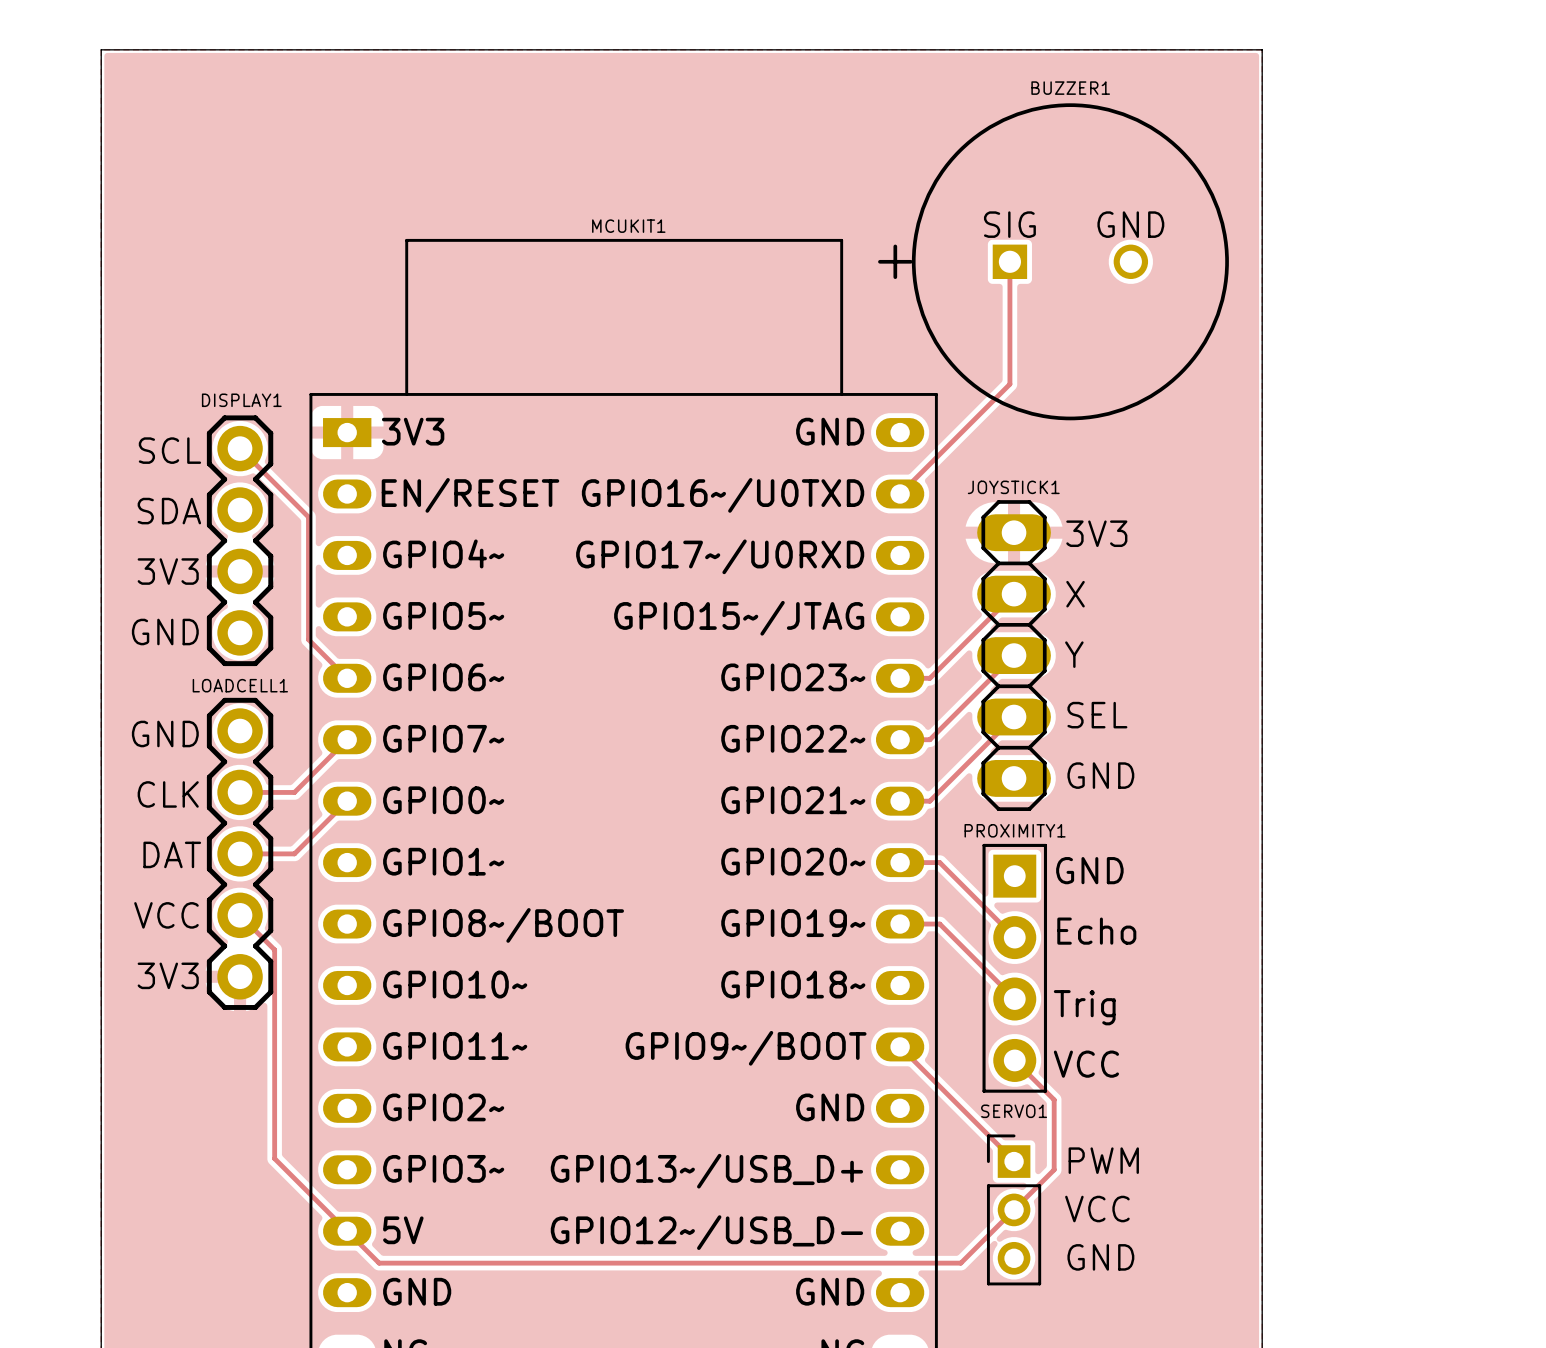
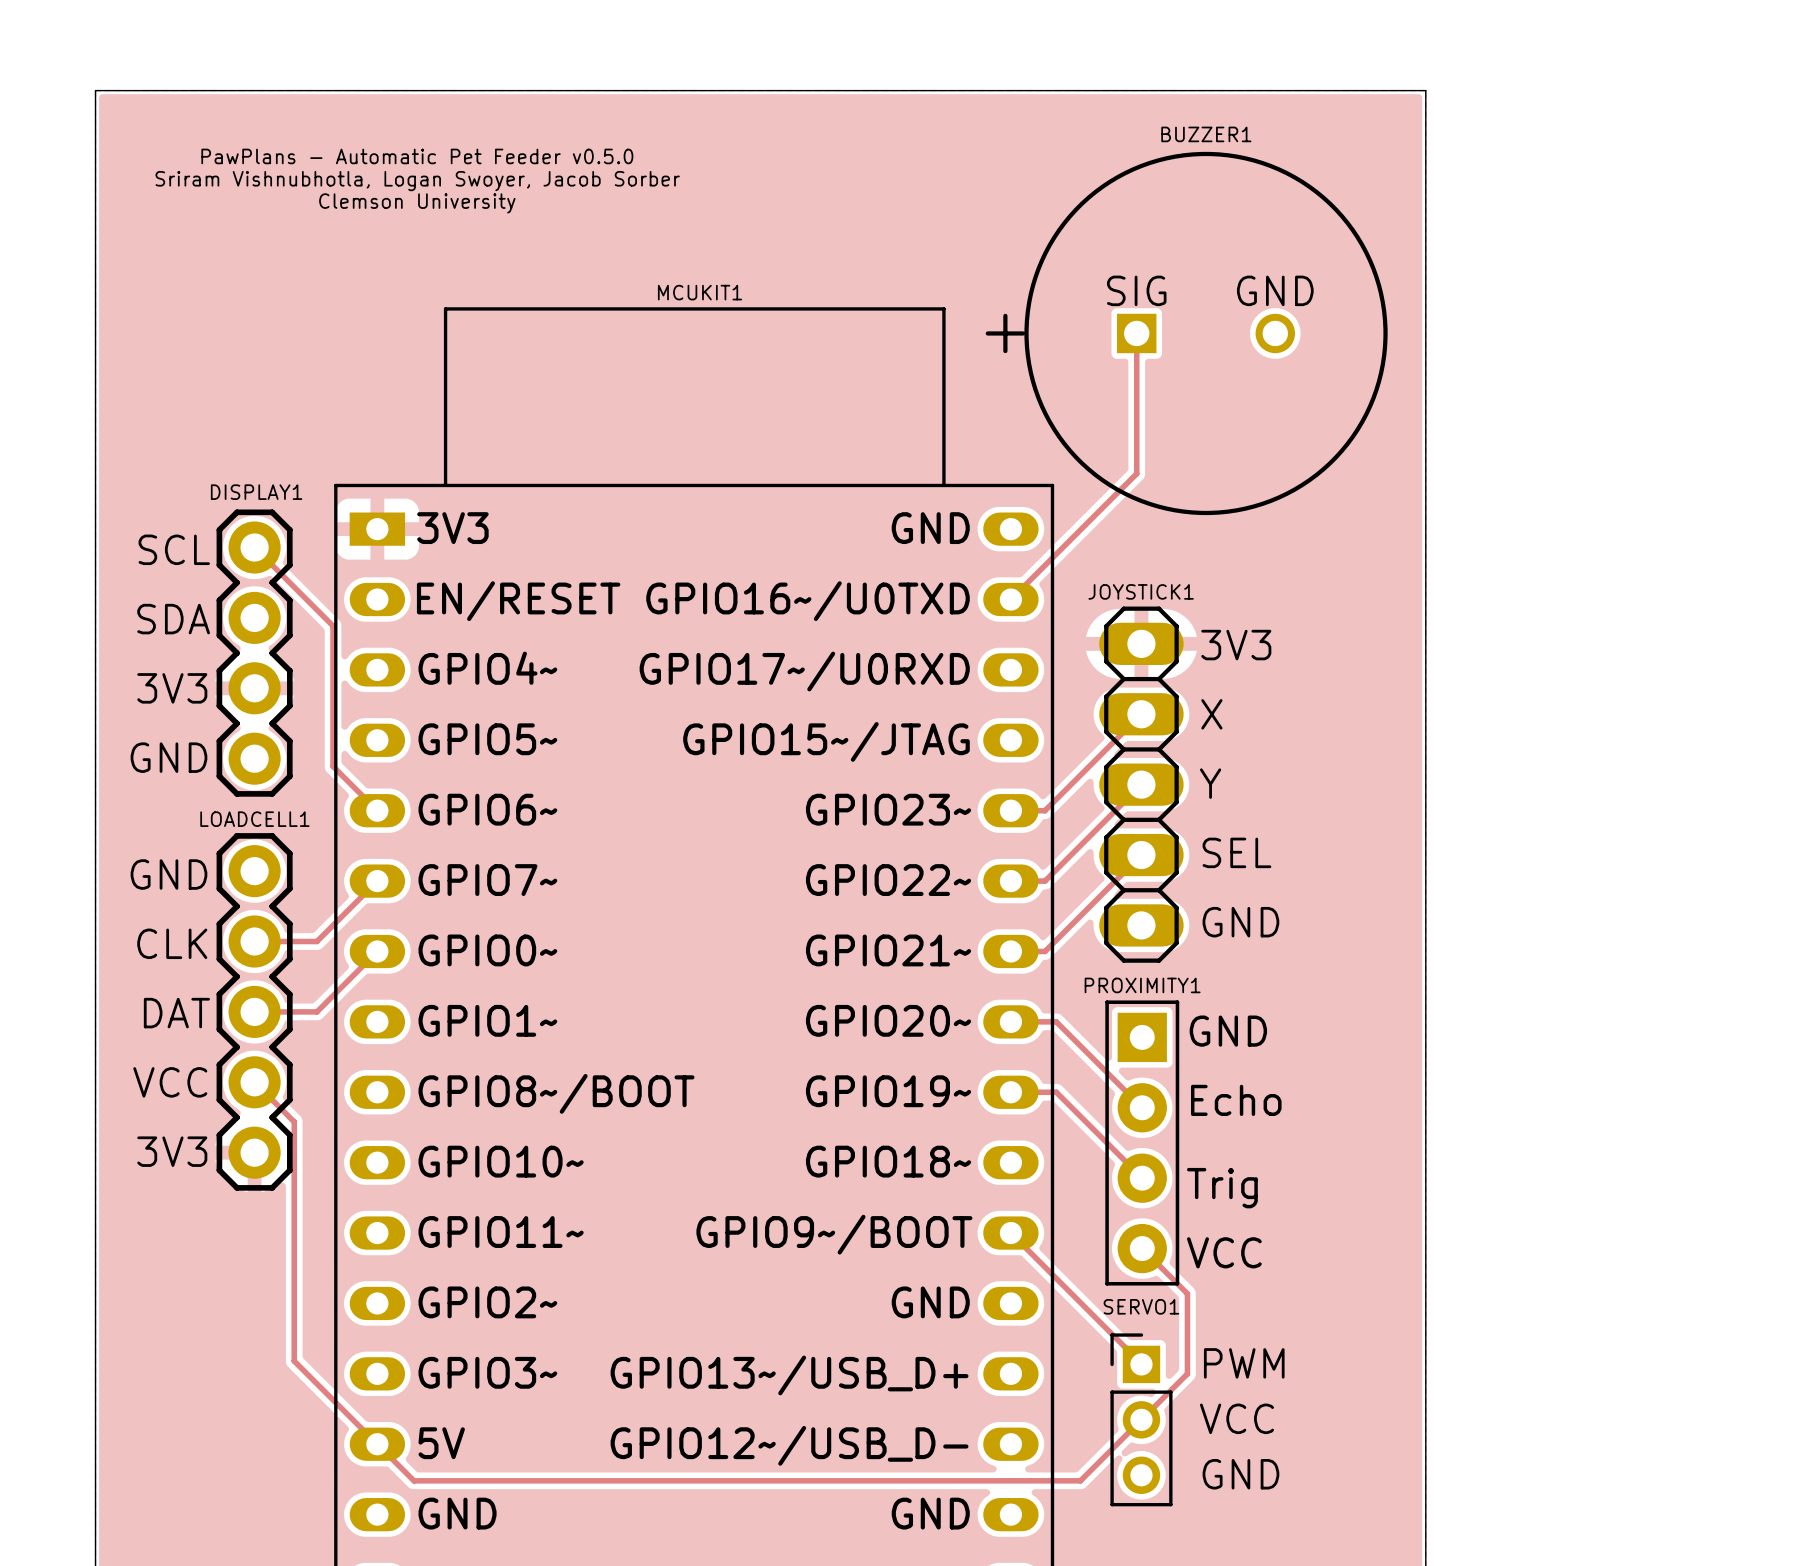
text: none -> PawPlans - Automatic Pet Feeder v0.5.0 (417, 156)
text: none -> Sriram Vishnubhotla, Logan Swoyer, Jacob Sorber (417, 181)
text: none -> Clemson University (417, 203)

